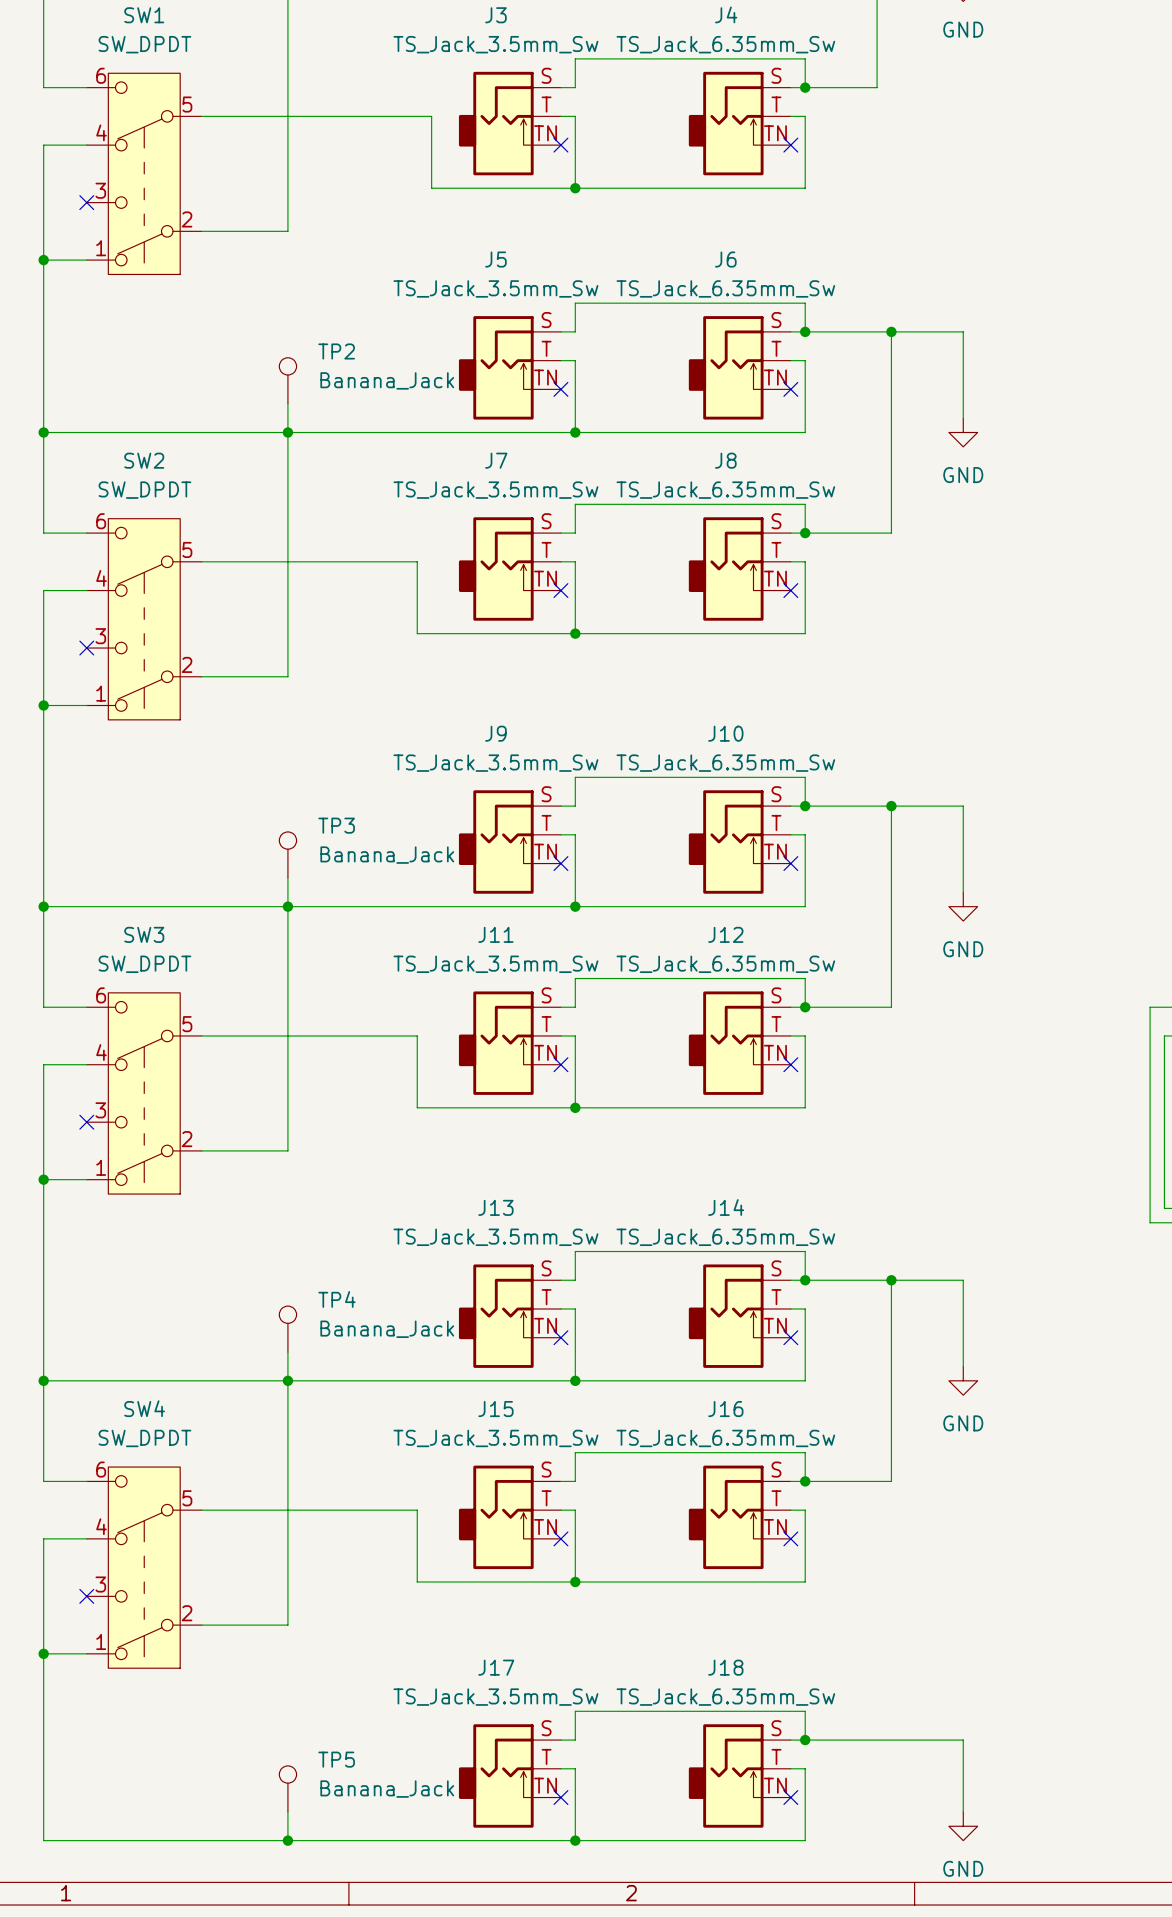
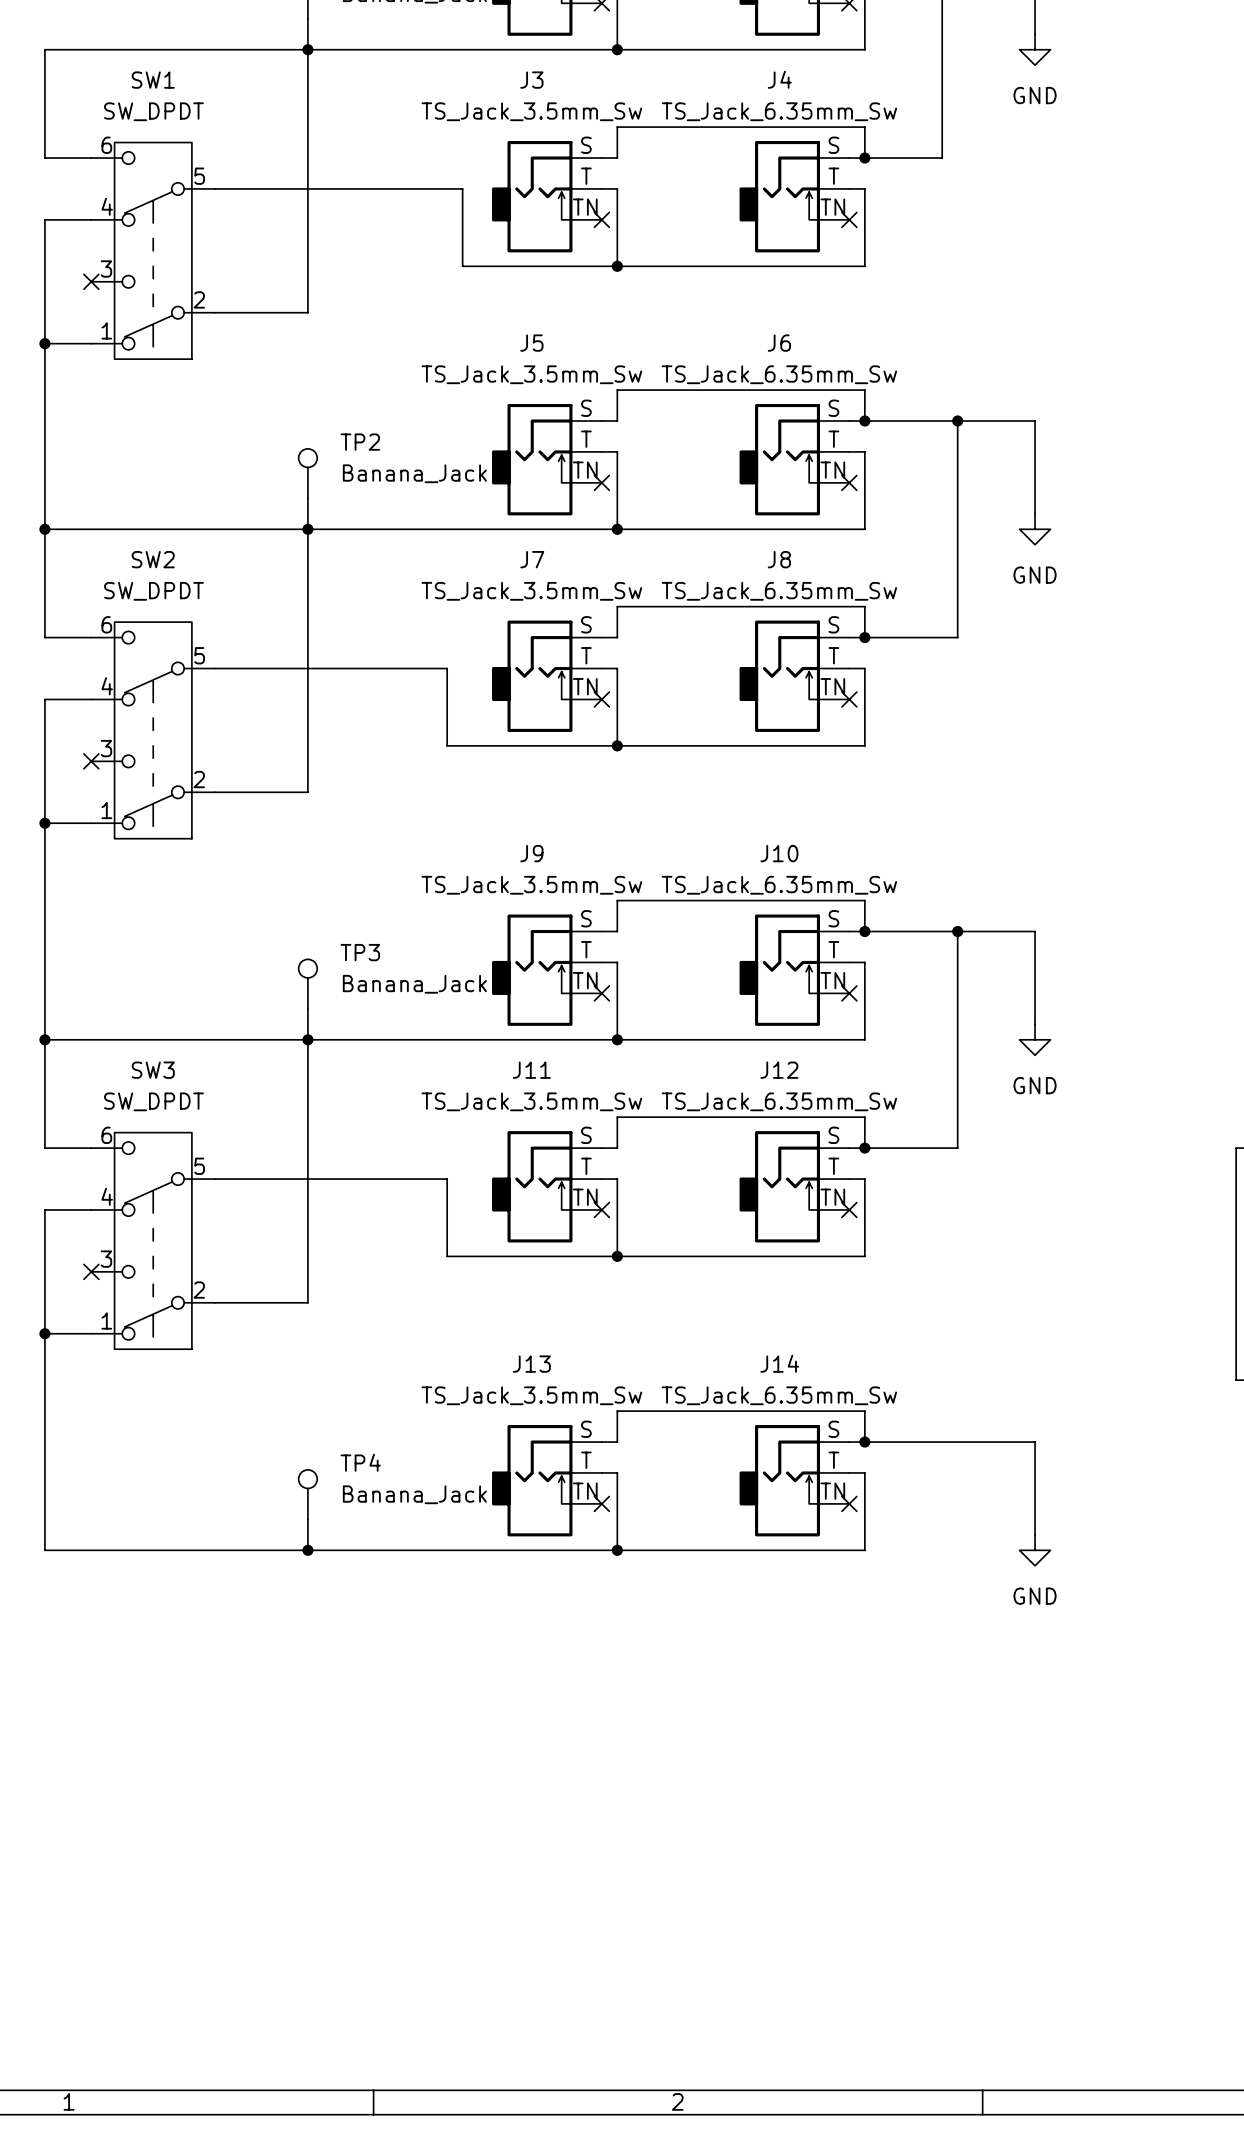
wire: (891, 1280) (891, 1481) (790, 1481) -> none
junction: (891, 1280) -> none
wire: (43, 1380) (43, 1481) (86, 1481) -> none
junction: (43, 1380) -> none
wire: (287, 1380) (287, 1625) (201, 1625) -> none
wire: (560, 1481) (575, 1481) (575, 1452) (805, 1452) (805, 1481) -> none
junction: (805, 1481) -> none
wire: (201, 1510) (417, 1510) (417, 1581) (805, 1581) (805, 1510) (790, 1510) -> none
wire: (560, 1510) (575, 1510) (575, 1581) -> none
J15: TS_Jack_3.5mm_Sw (509, 1517) -> none
J16: TS_Jack_6.35mm_Sw (739, 1517) -> none
wire: (86, 1538) (43, 1538) (43, 1840) (805, 1840) (805, 1768) (790, 1768) -> none
no-connect mark: (560, 1538) -> none
no-connect mark: (790, 1538) -> none
SW4: SW_DPDT (144, 1567) -> none
junction: (575, 1581) -> none
no-connect mark: (86, 1596) -> none
wire: (43, 1653) (86, 1653) -> none
junction: (43, 1653) -> none
wire: (560, 1740) (575, 1740) (575, 1711) (805, 1711) (805, 1740) -> none
wire: (790, 1740) (963, 1740) (963, 1811) -> none
junction: (805, 1740) -> none
wire: (560, 1768) (575, 1768) (575, 1840) -> none
J17: TS_Jack_3.5mm_Sw (509, 1775) -> none
J18: TS_Jack_6.35mm_Sw (739, 1775) -> none
TP5: Banana_Jack (287, 1788) -> none
no-connect mark: (560, 1797) -> none
no-connect mark: (790, 1797) -> none
wire: (287, 1811) (287, 1840) -> none
power symbol: GND (963, 1826) -> none
junction: (287, 1840) -> none
junction: (575, 1840) -> none

